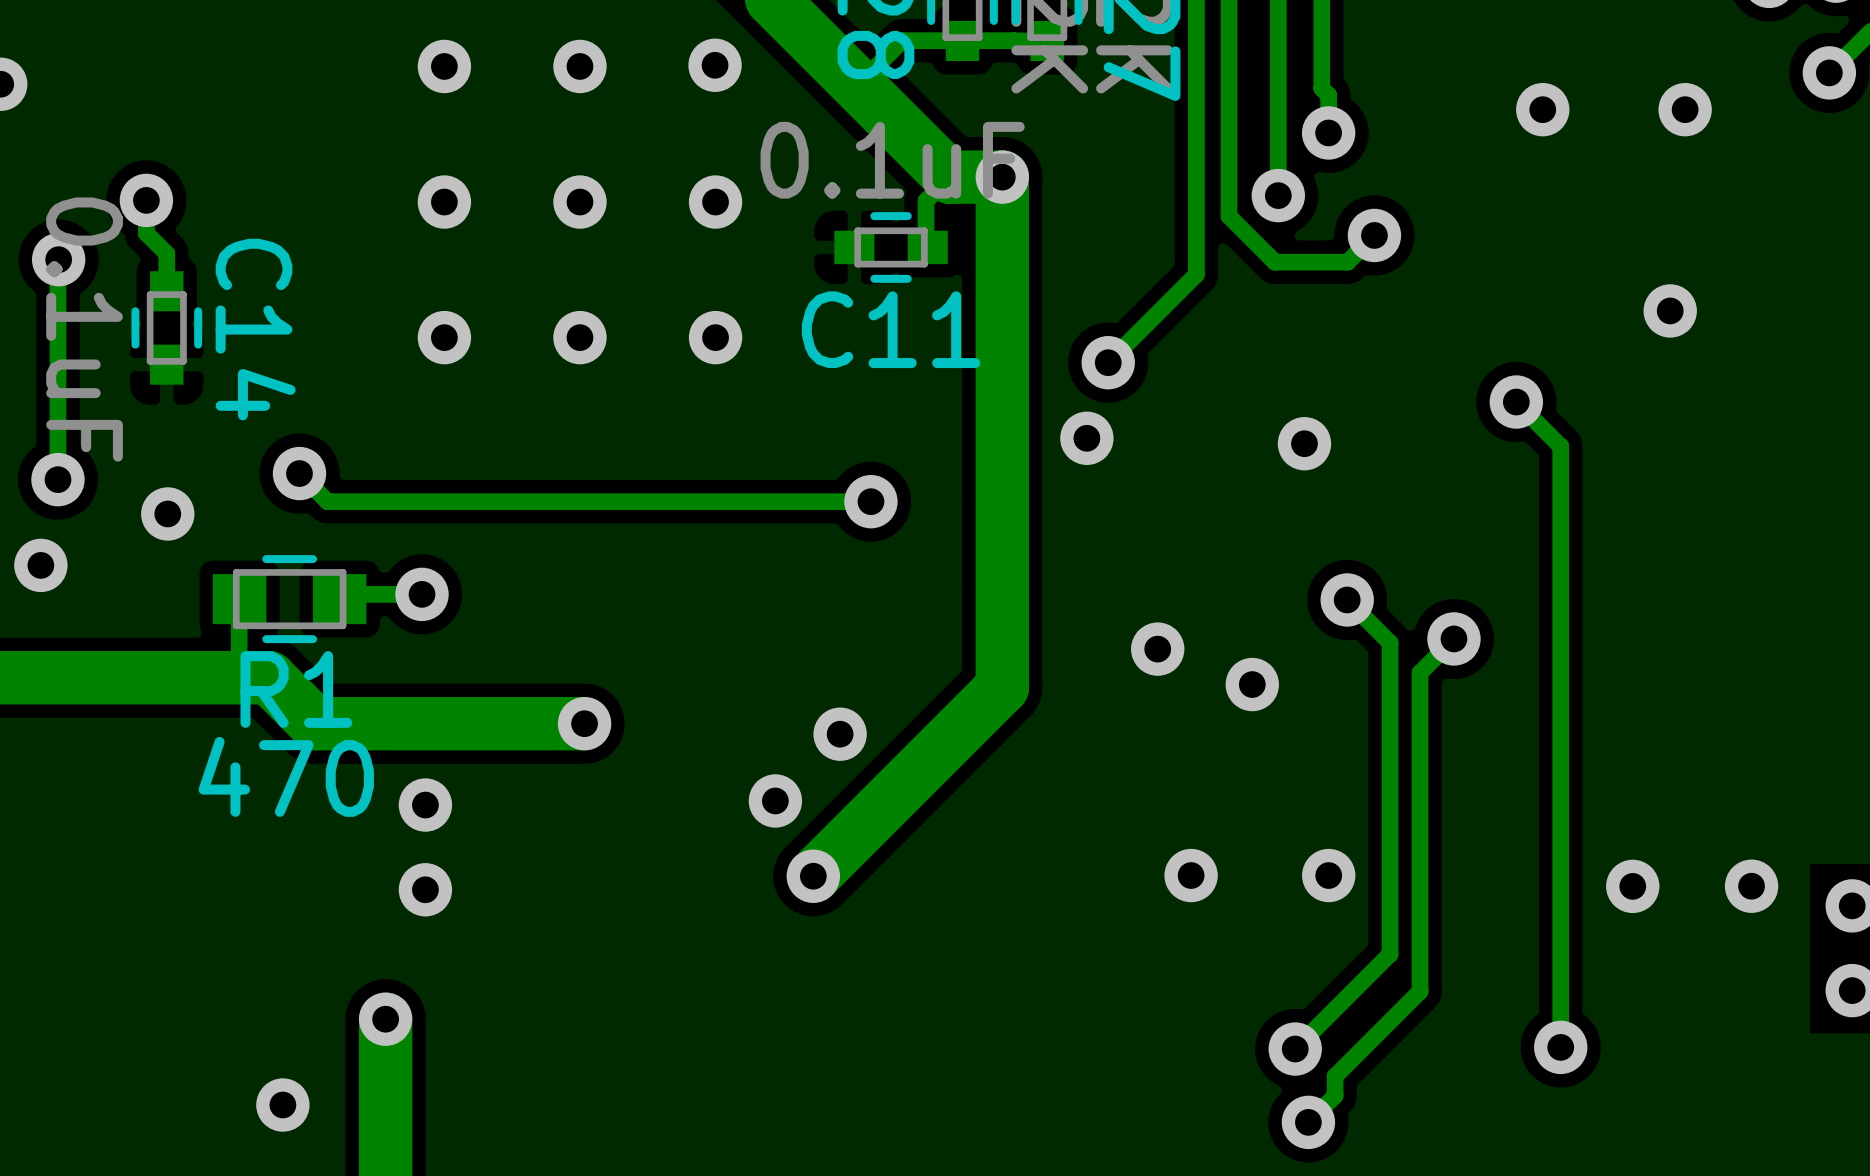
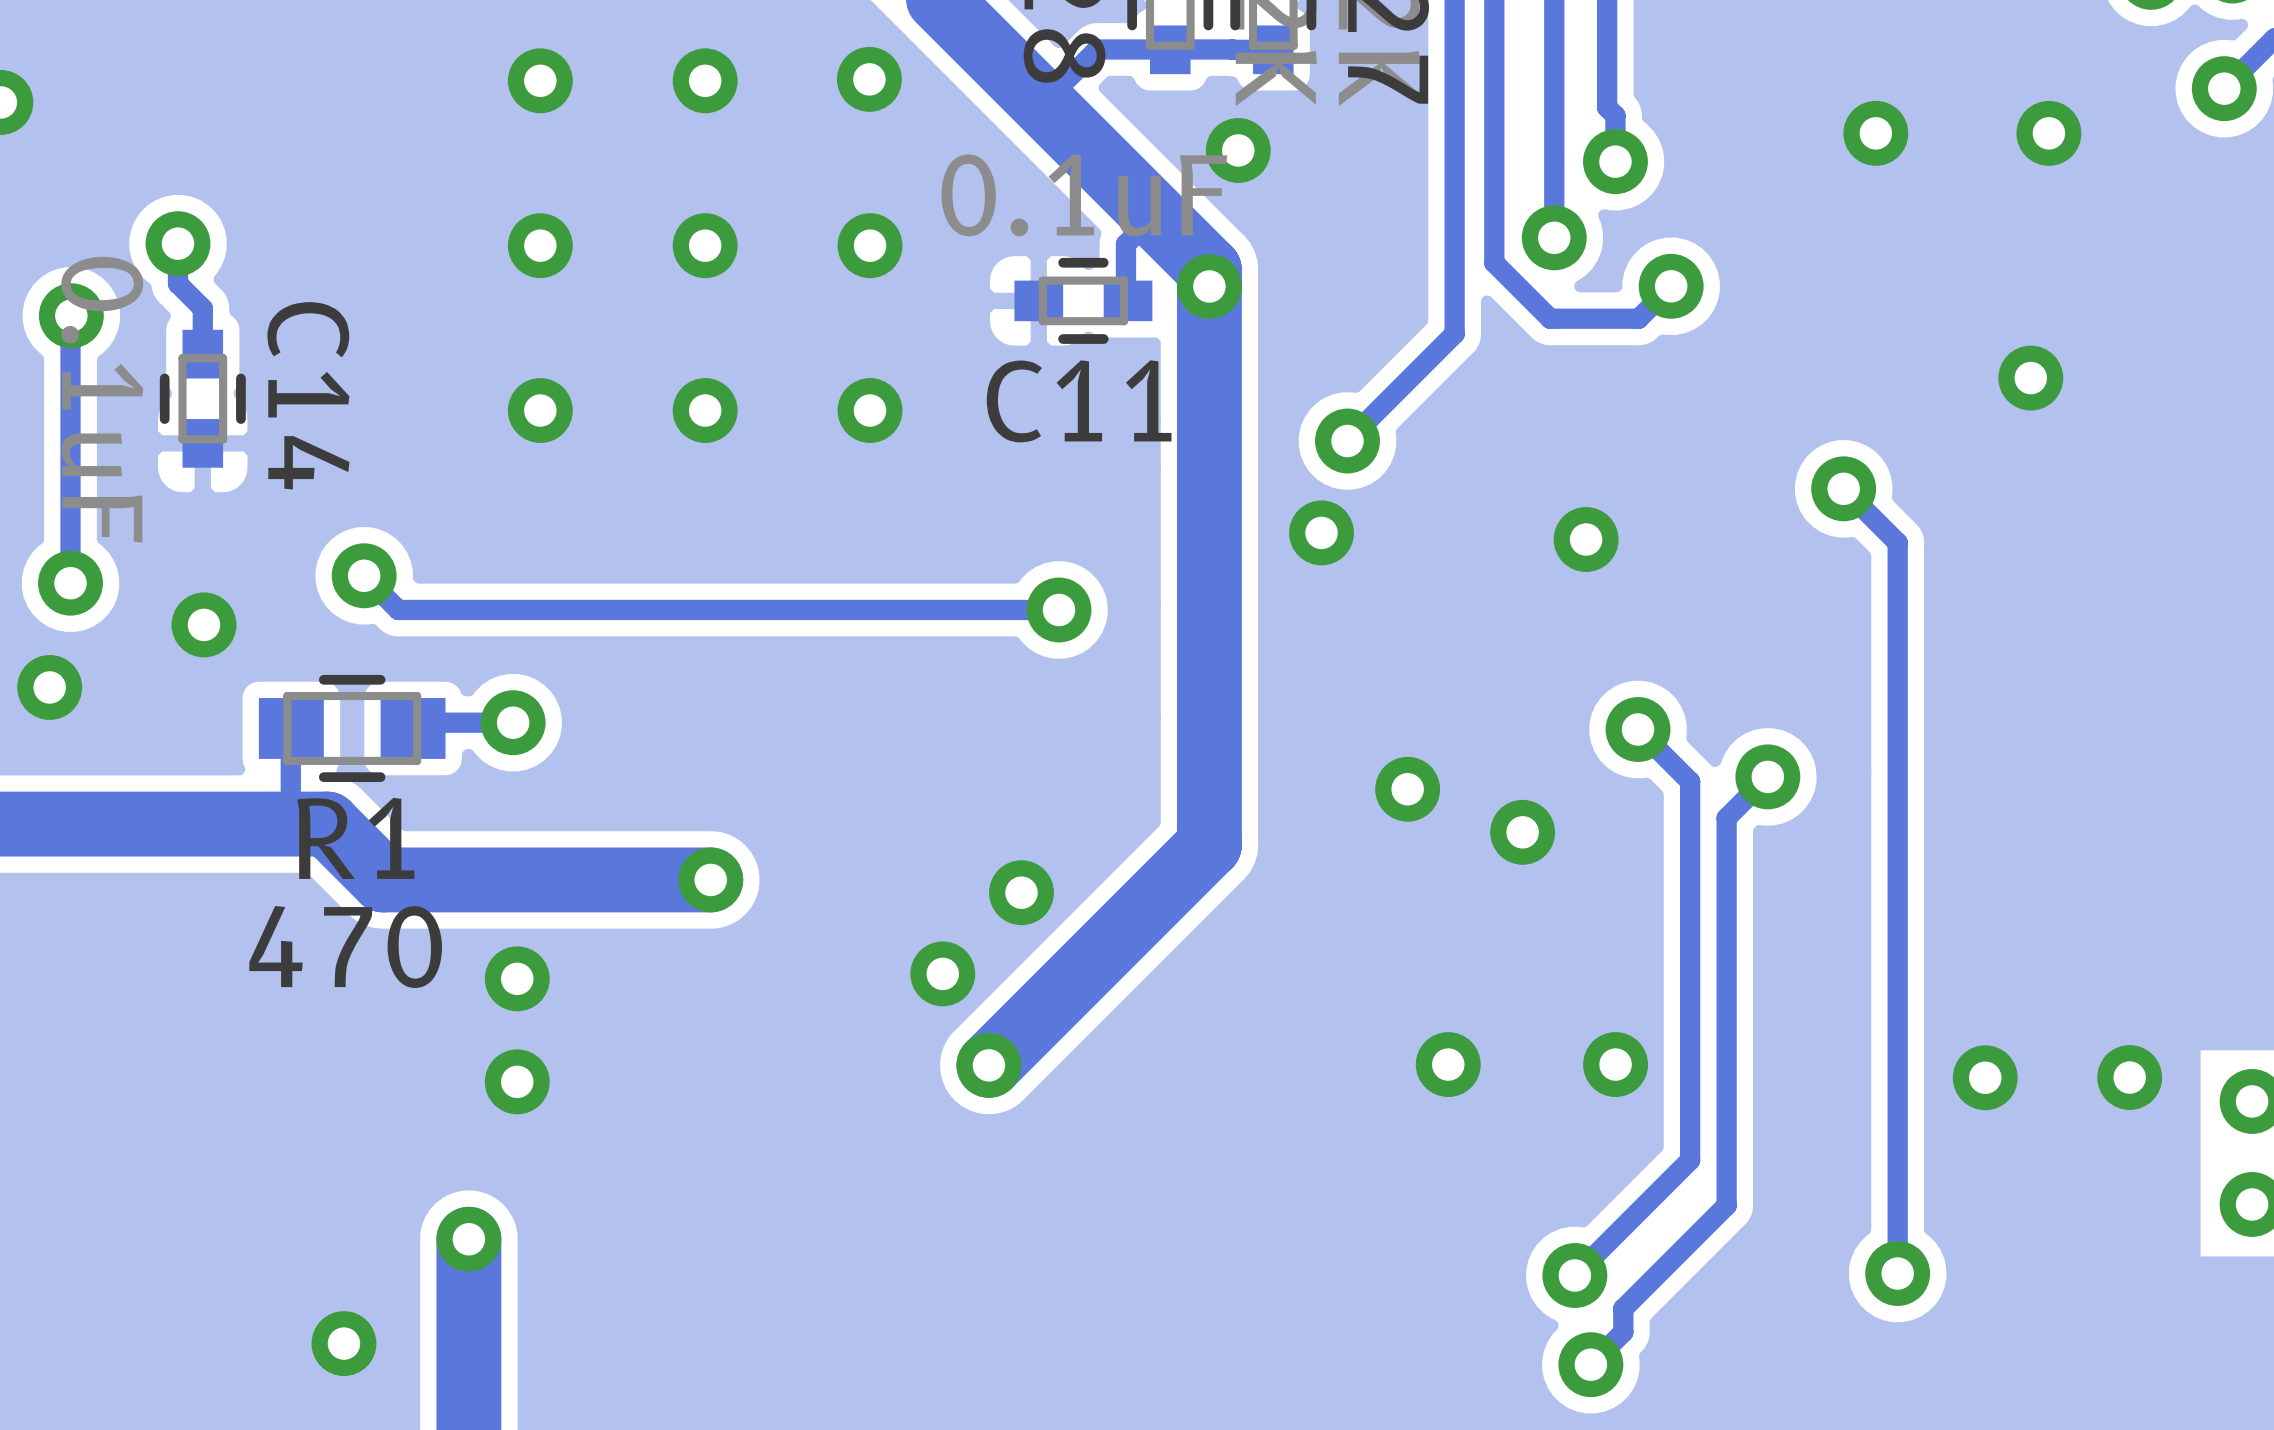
via: none -> (1238, 150)
track: (949, 177) (1002, 177) (1002, 687) (994, 694) -> (1154, 215) (1209, 269) (1209, 844)
via: (1002, 177) -> none
via: none -> (1209, 286)

